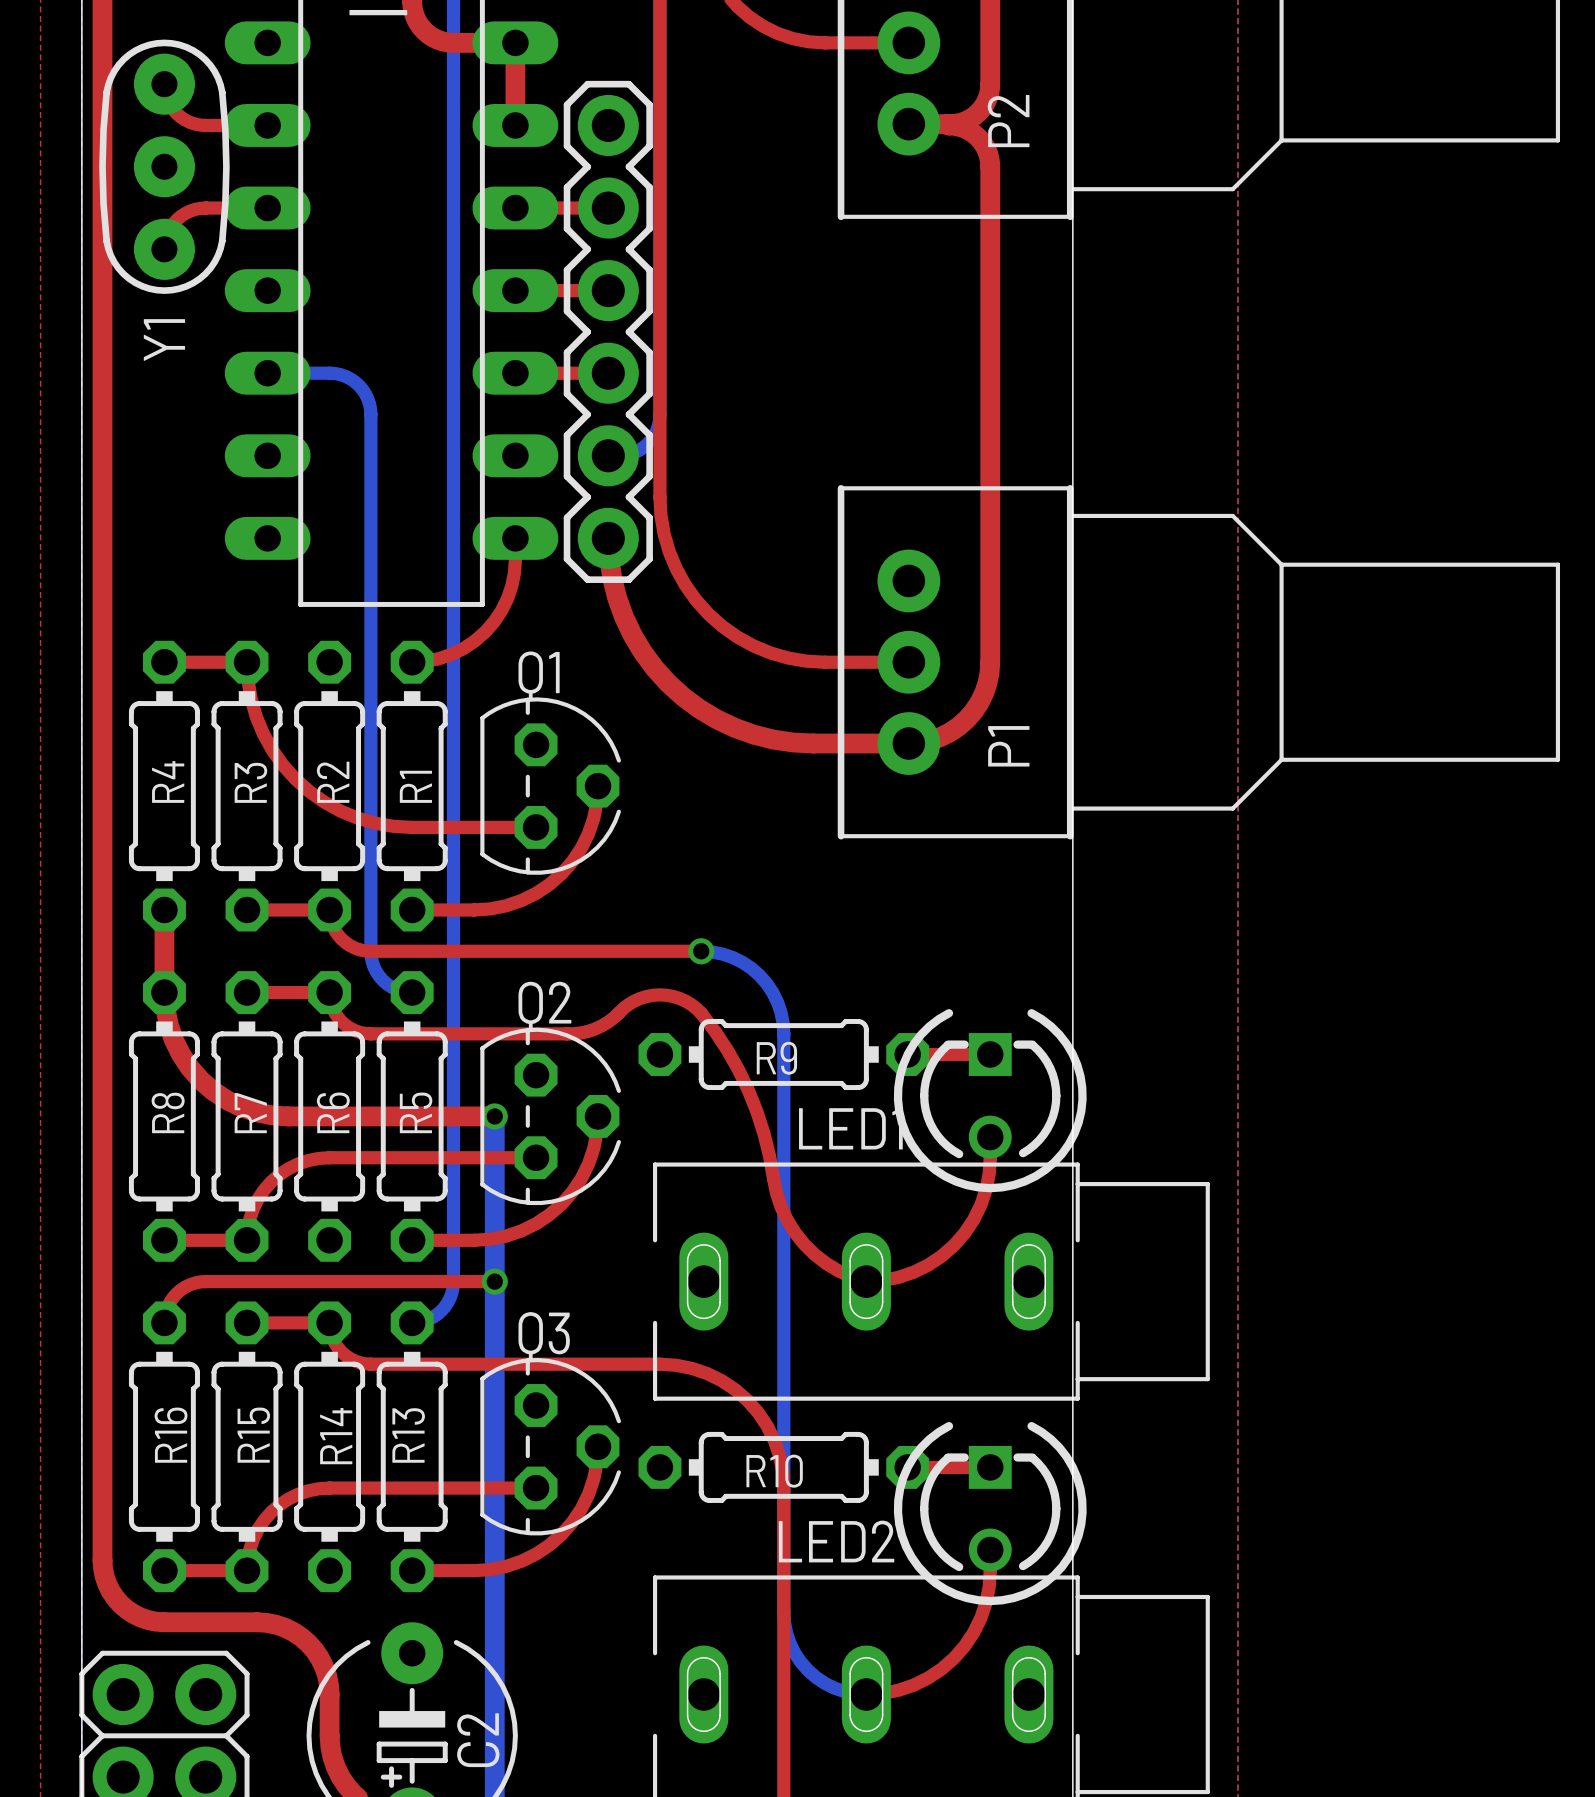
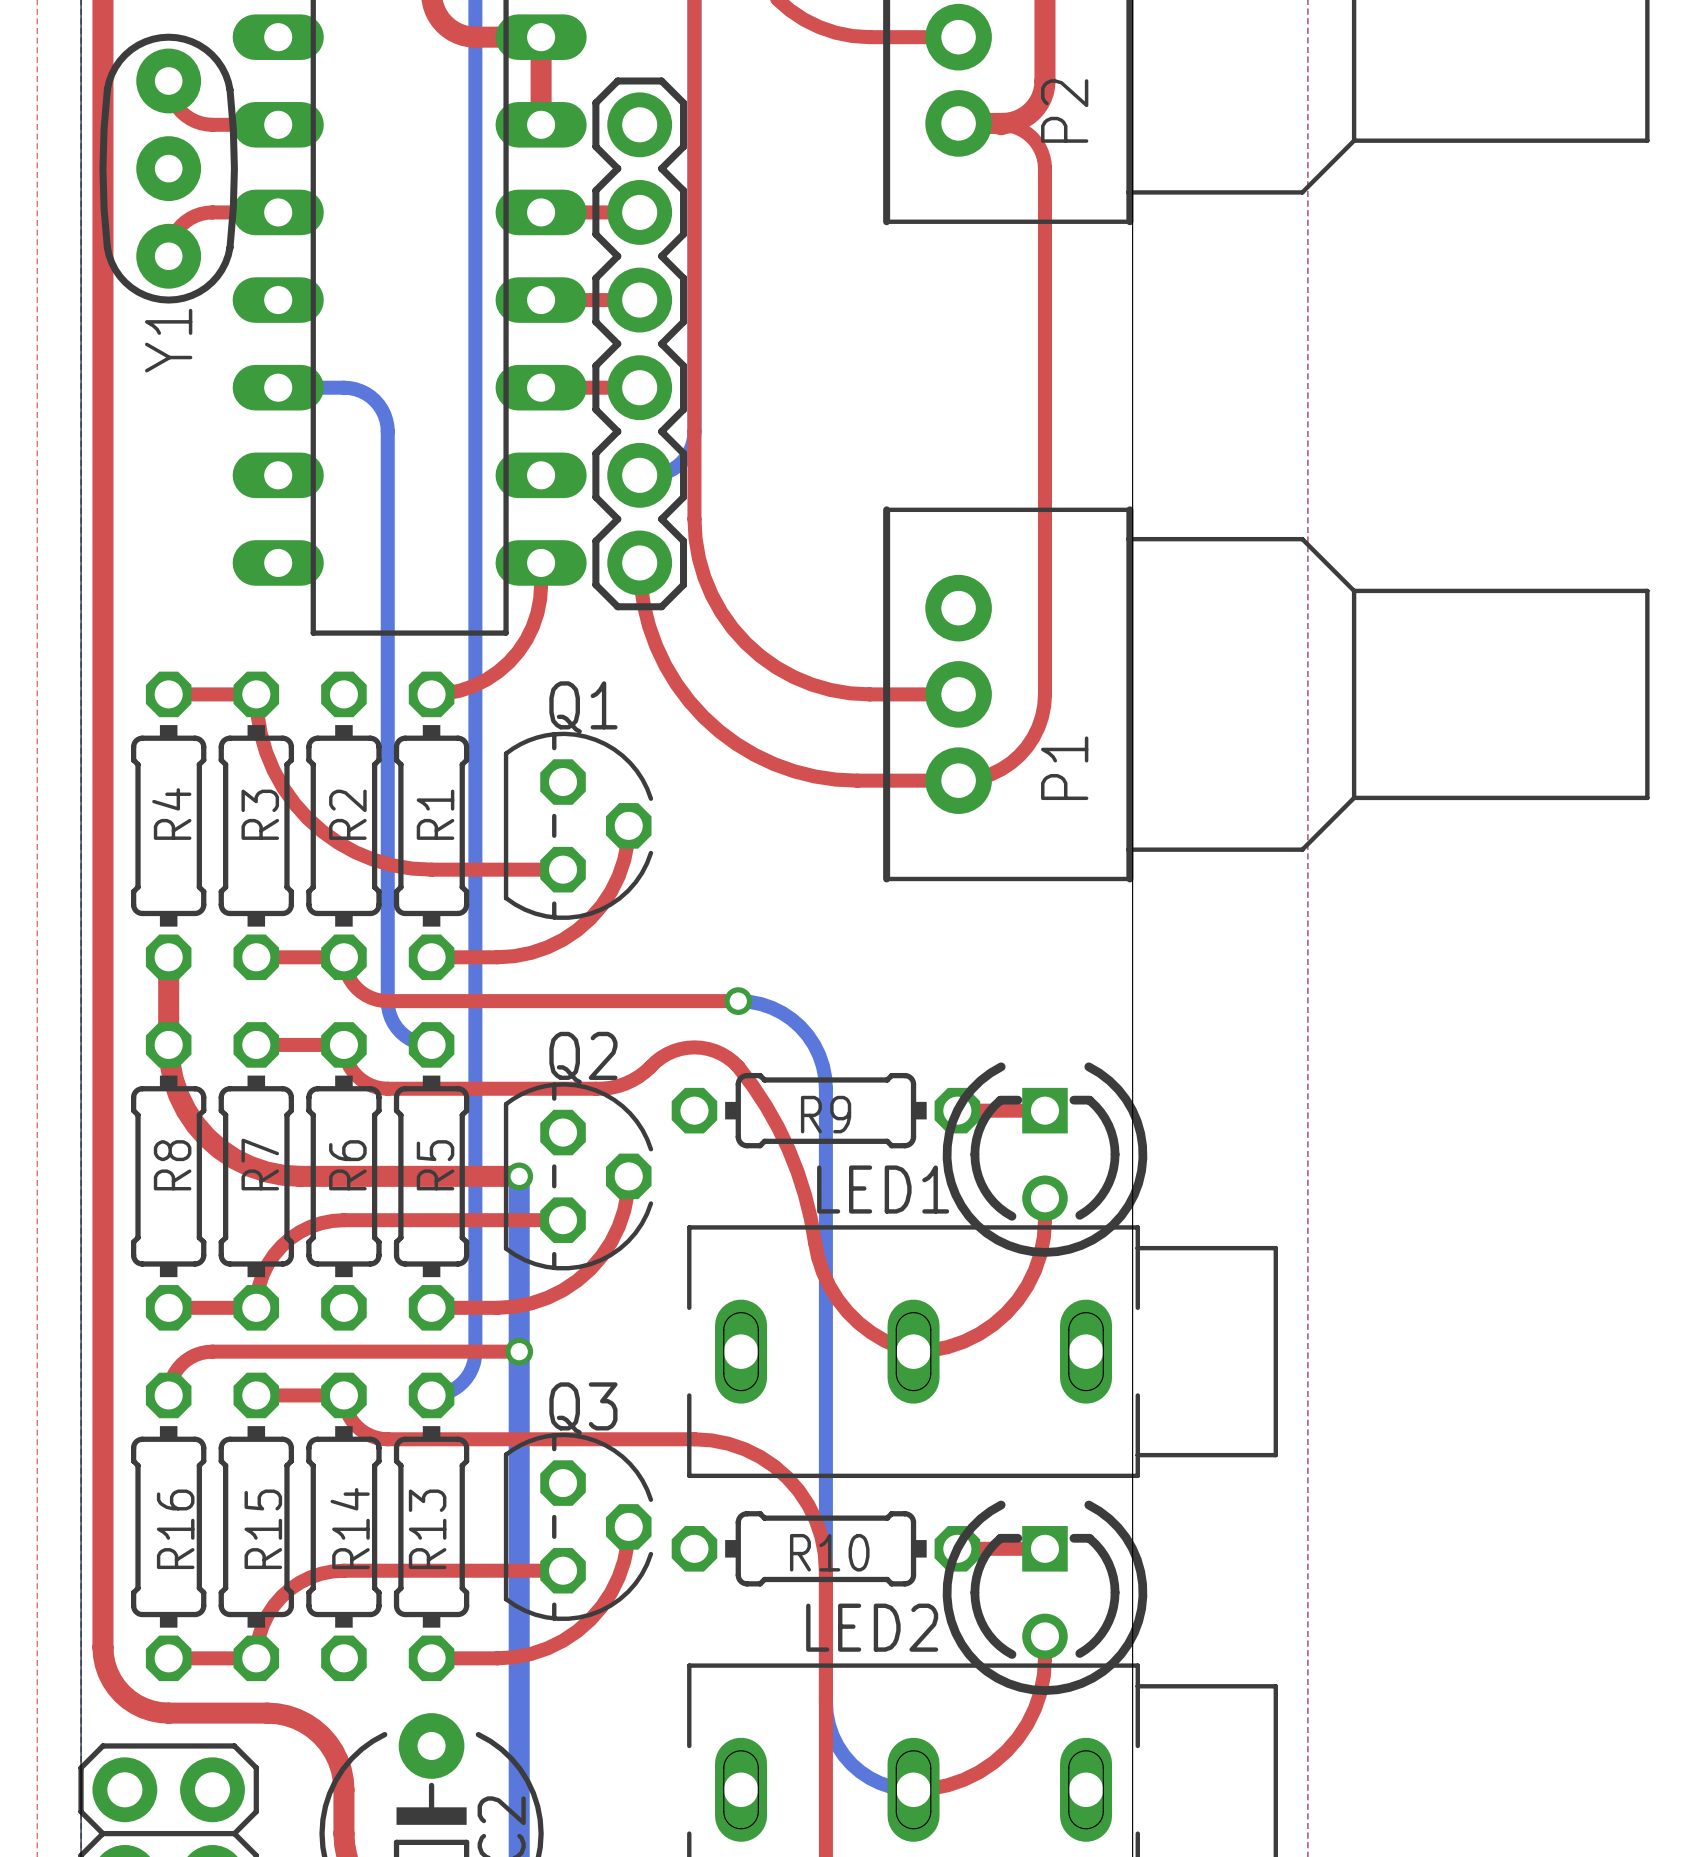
top track width: thick (948, 125) (964, 128) (978, 137) (987, 150) (990, 166) (990, 662) (987, 683) (973, 711) (958, 726) (940, 737) (908, 743) (793, 742) (753, 734) (716, 719) (683, 696) (654, 668) (642, 652) (623, 616) (617, 597) (612, 578) (608, 538) -> thin (1001, 124) (1017, 128) (1032, 137) (1041, 151) (1044, 168) (1044, 694) (1042, 716) (1027, 746) (1011, 762) (991, 774) (958, 780) (836, 779) (794, 771) (754, 754) (719, 731) (689, 701) (676, 683) (656, 646) (649, 626) (643, 605) (639, 562)

